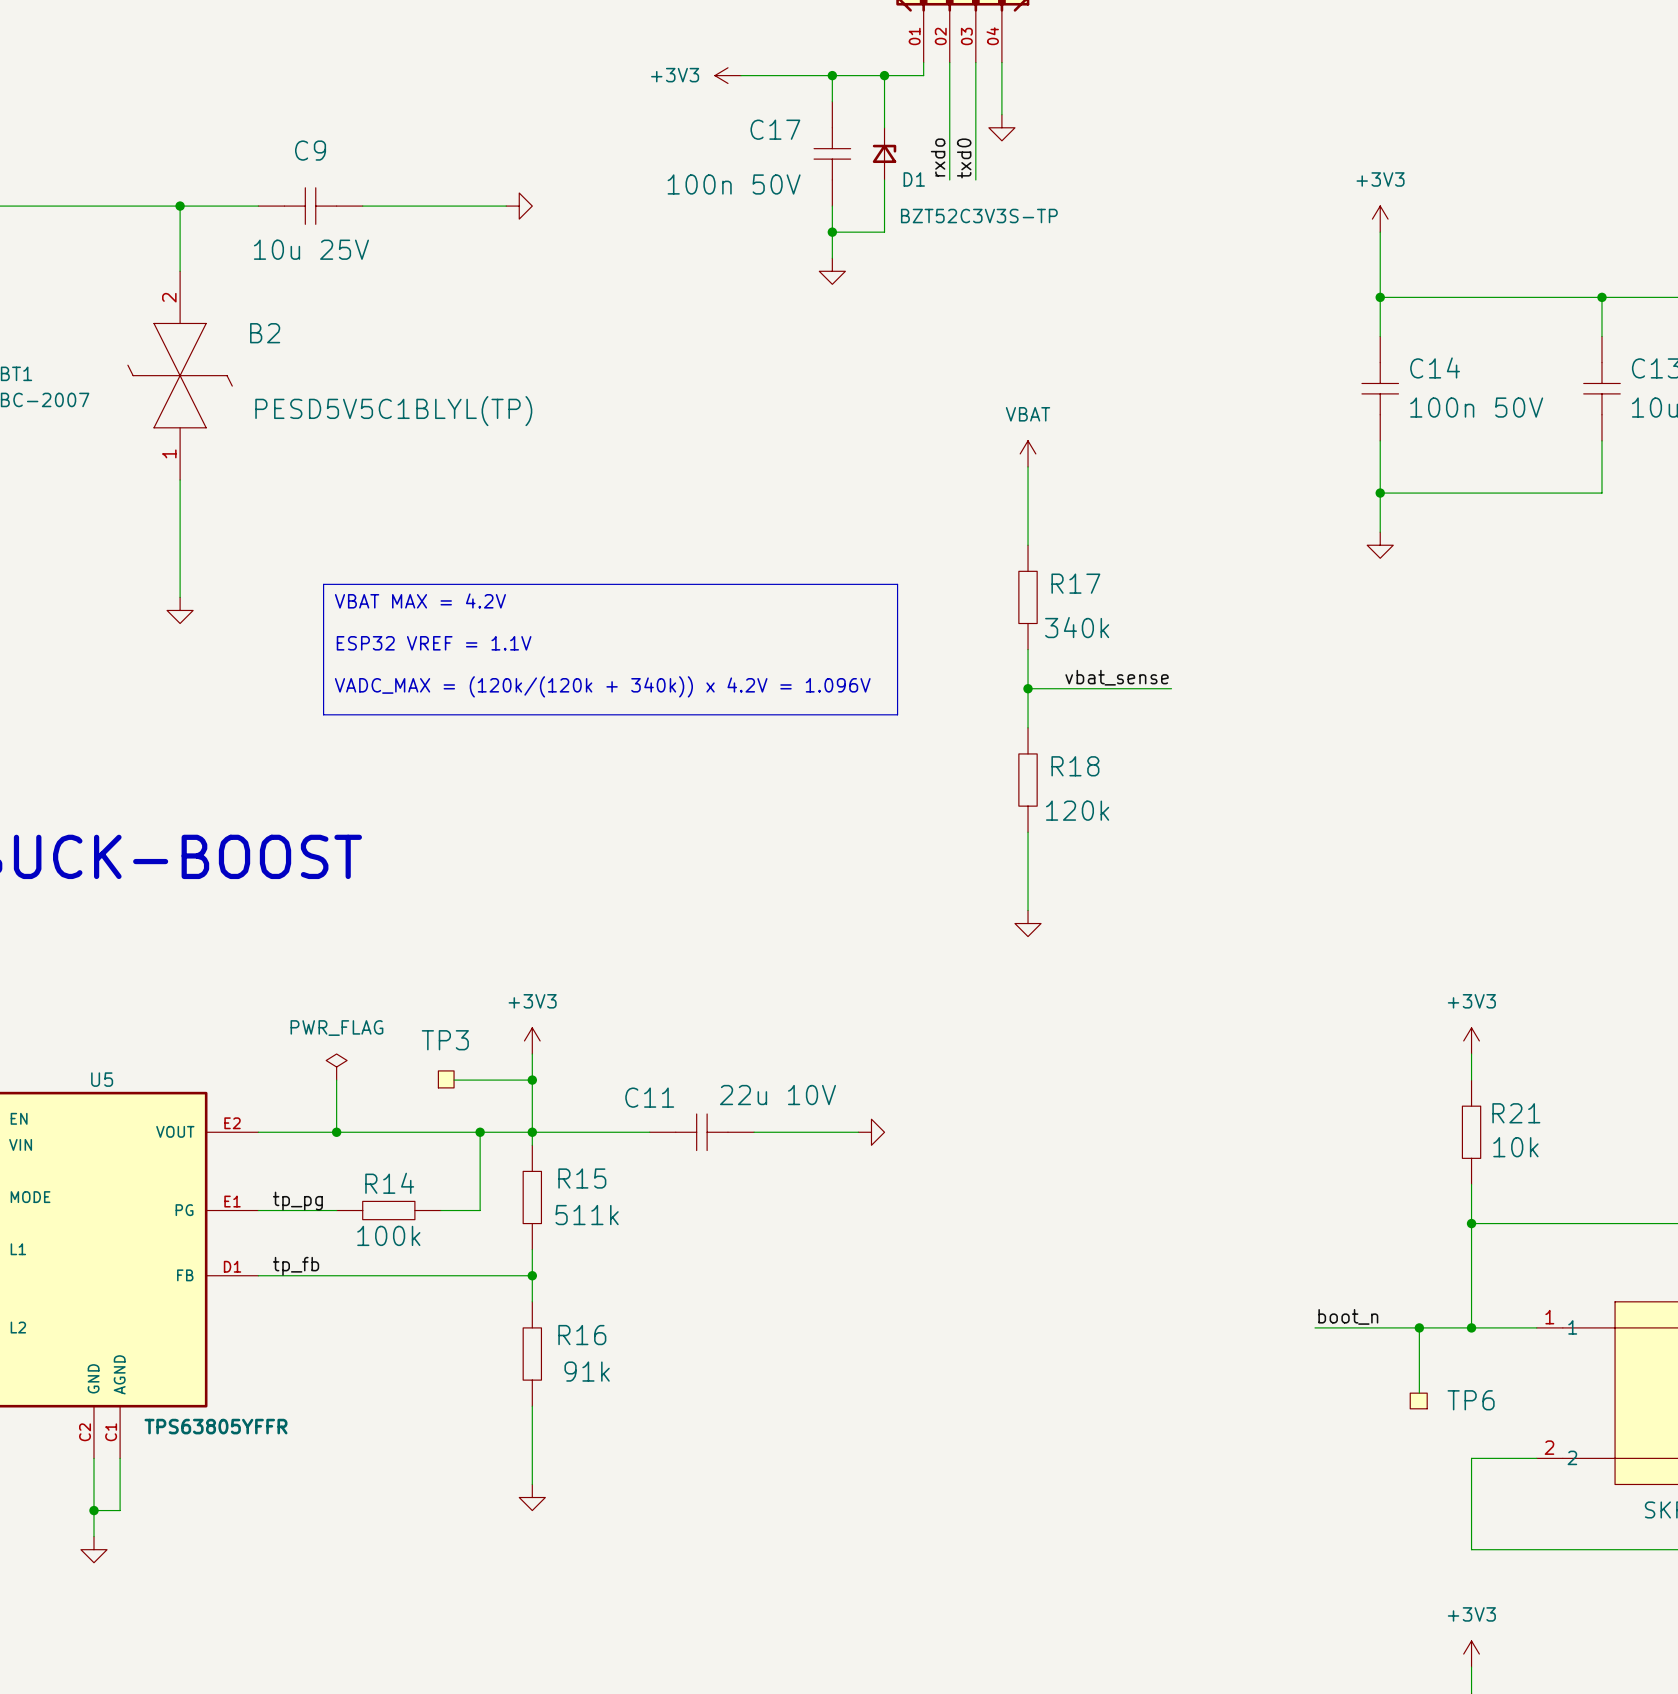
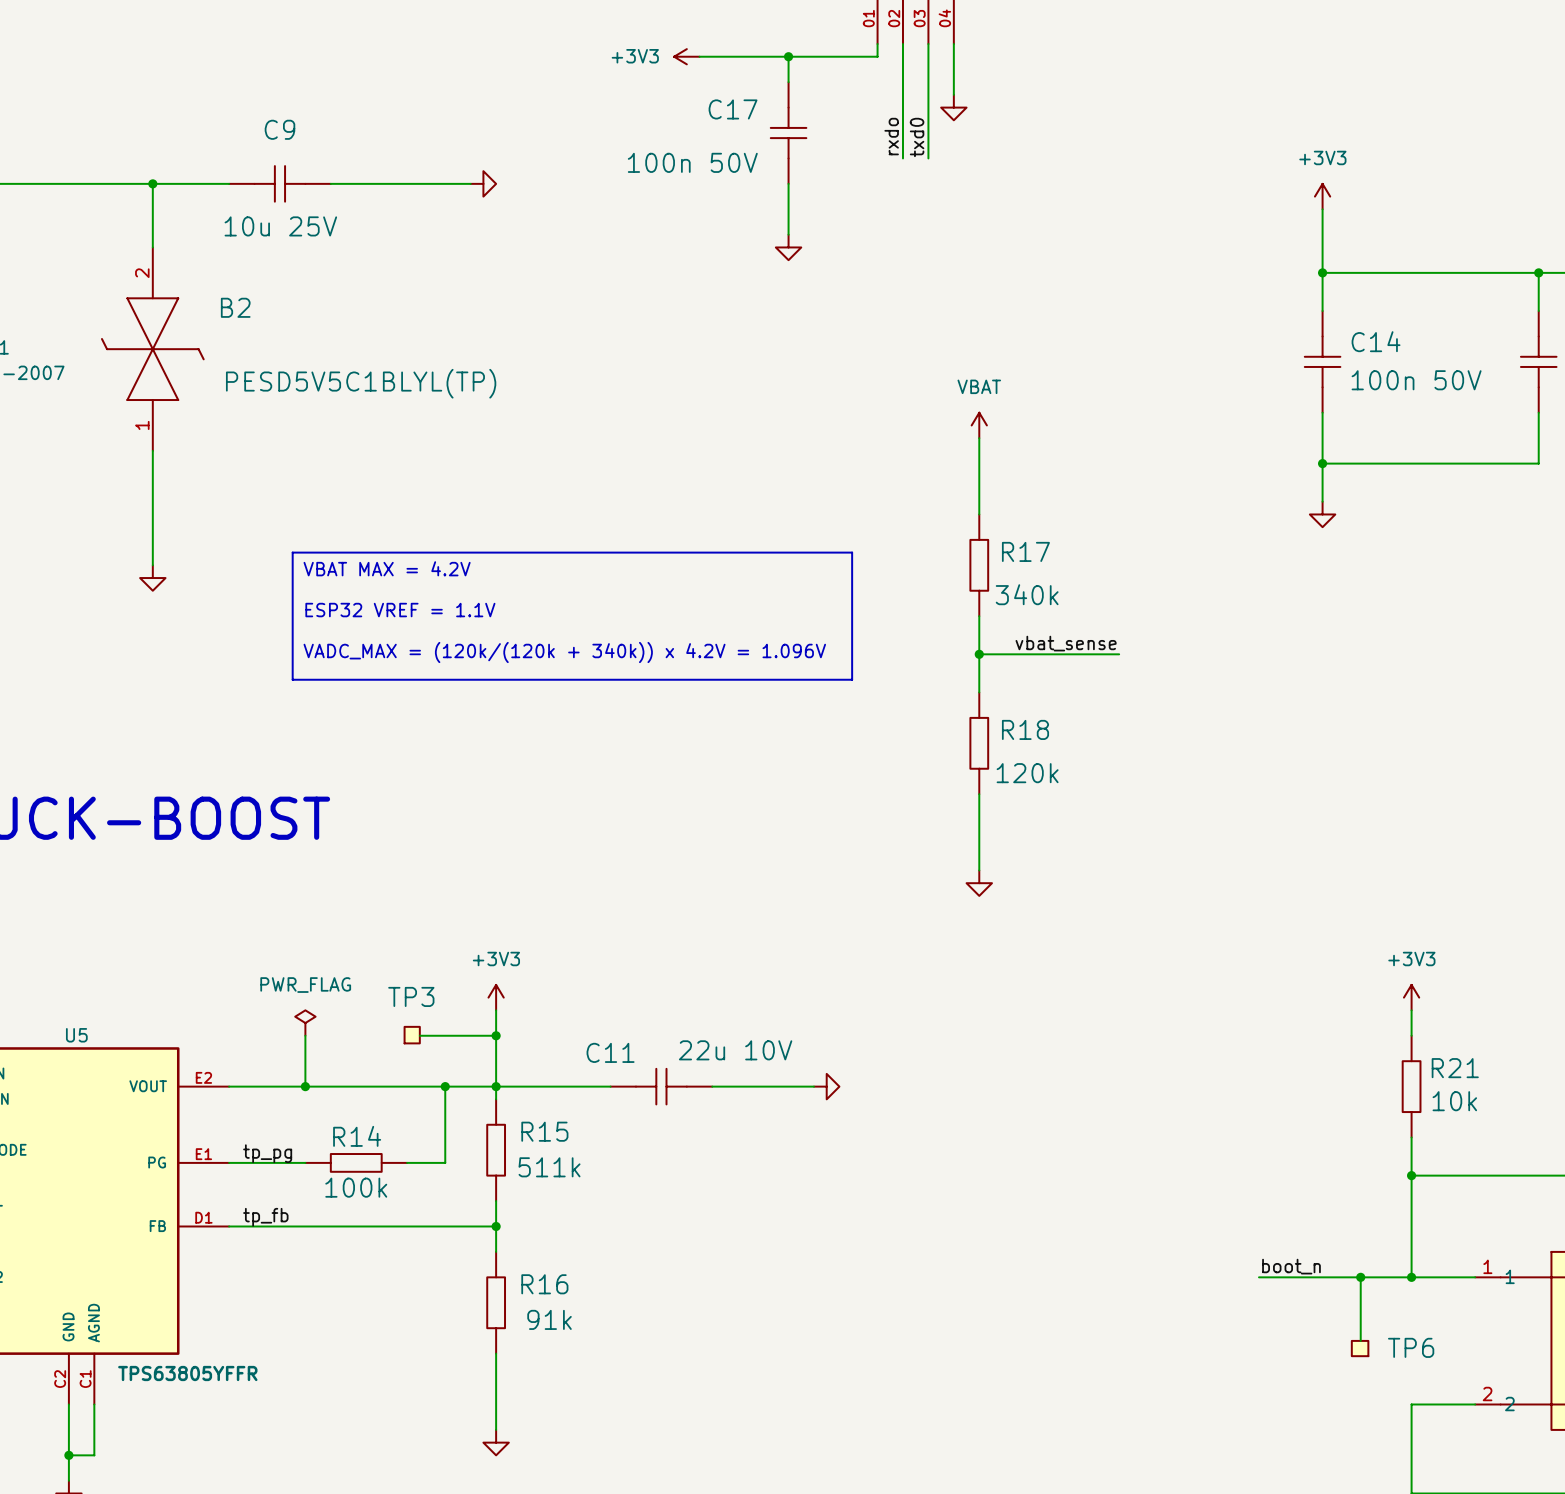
wire: (884, 75) (884, 127) -> none
junction: (884, 75) -> none
D1: BZT52C3V3S-TP (884, 153) -> none
wire: (884, 179) (884, 232) (832, 232) -> none
junction: (832, 232) -> none

